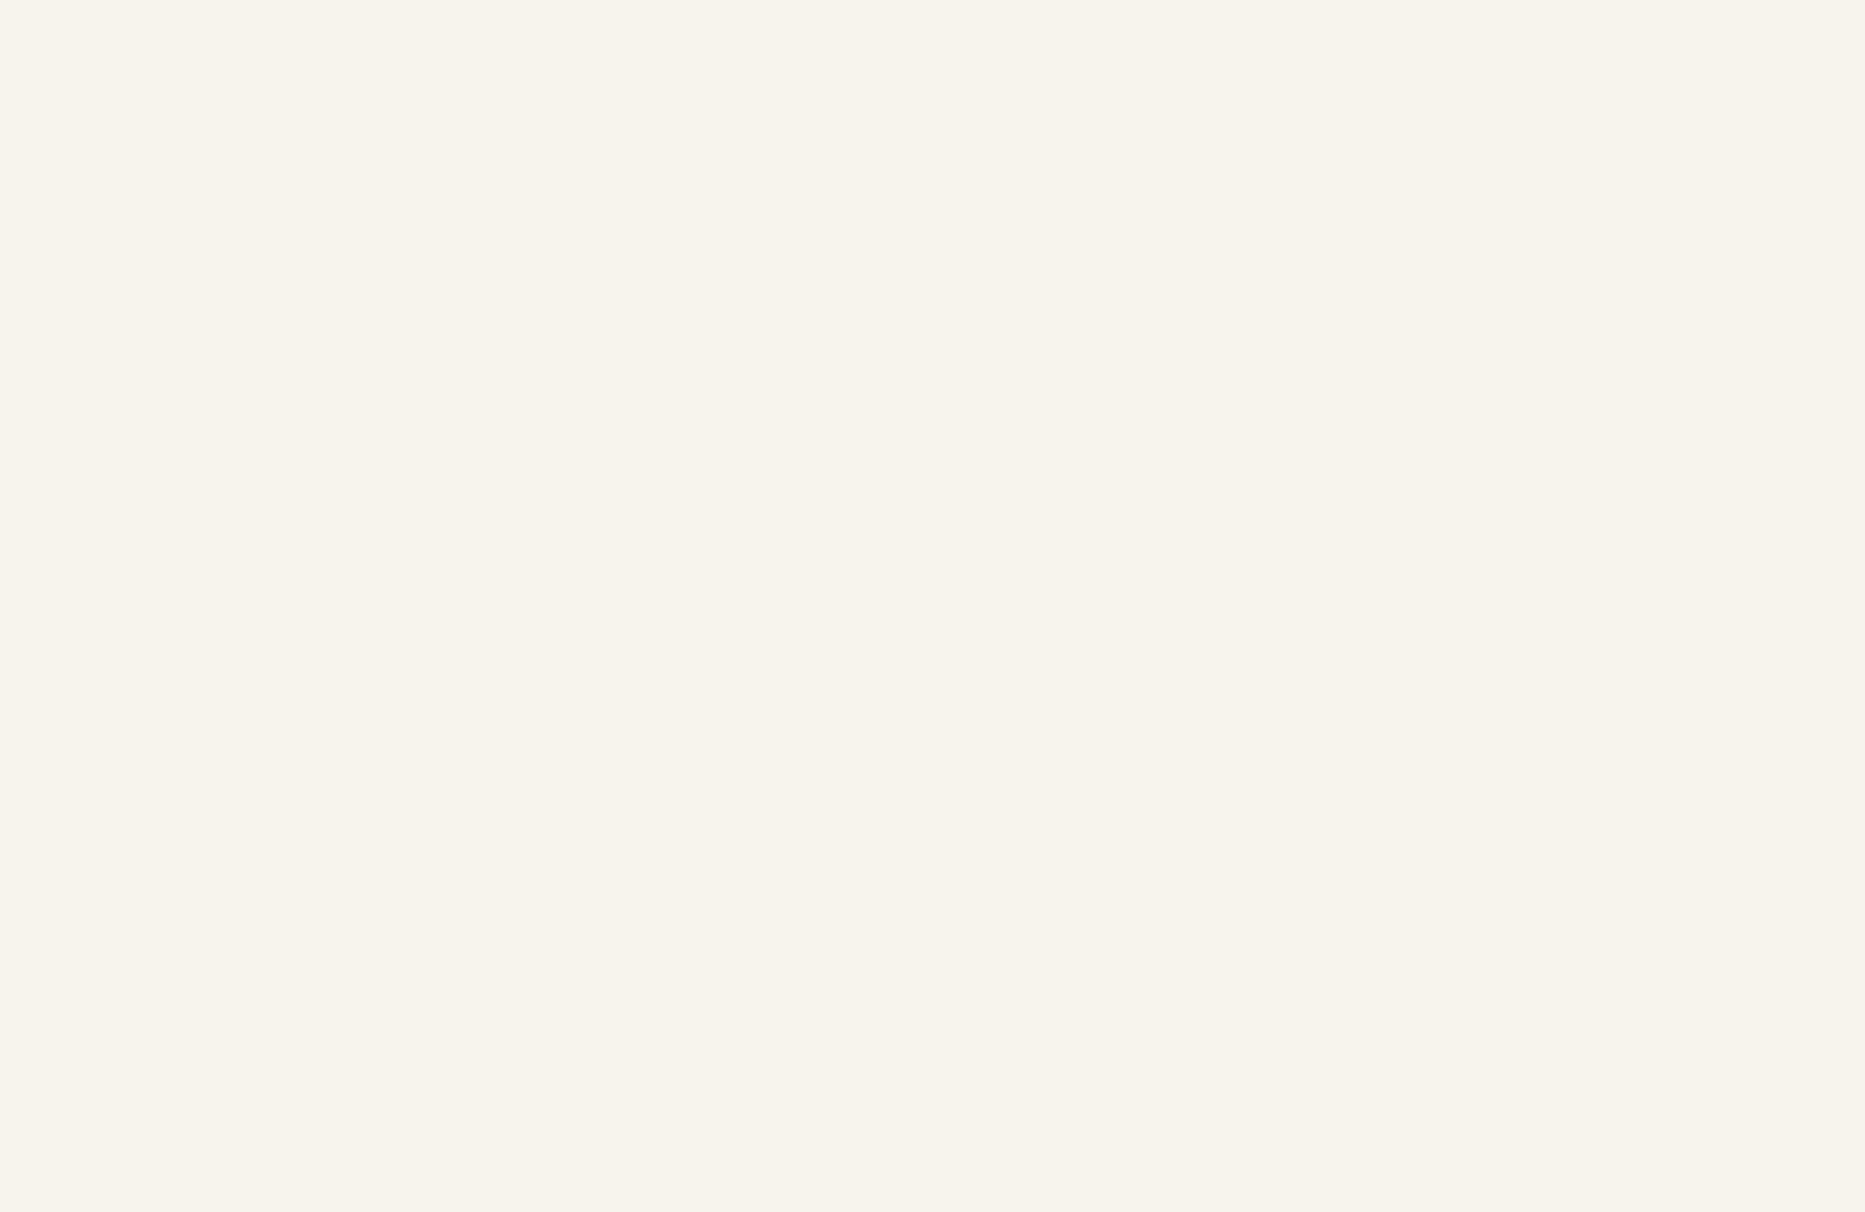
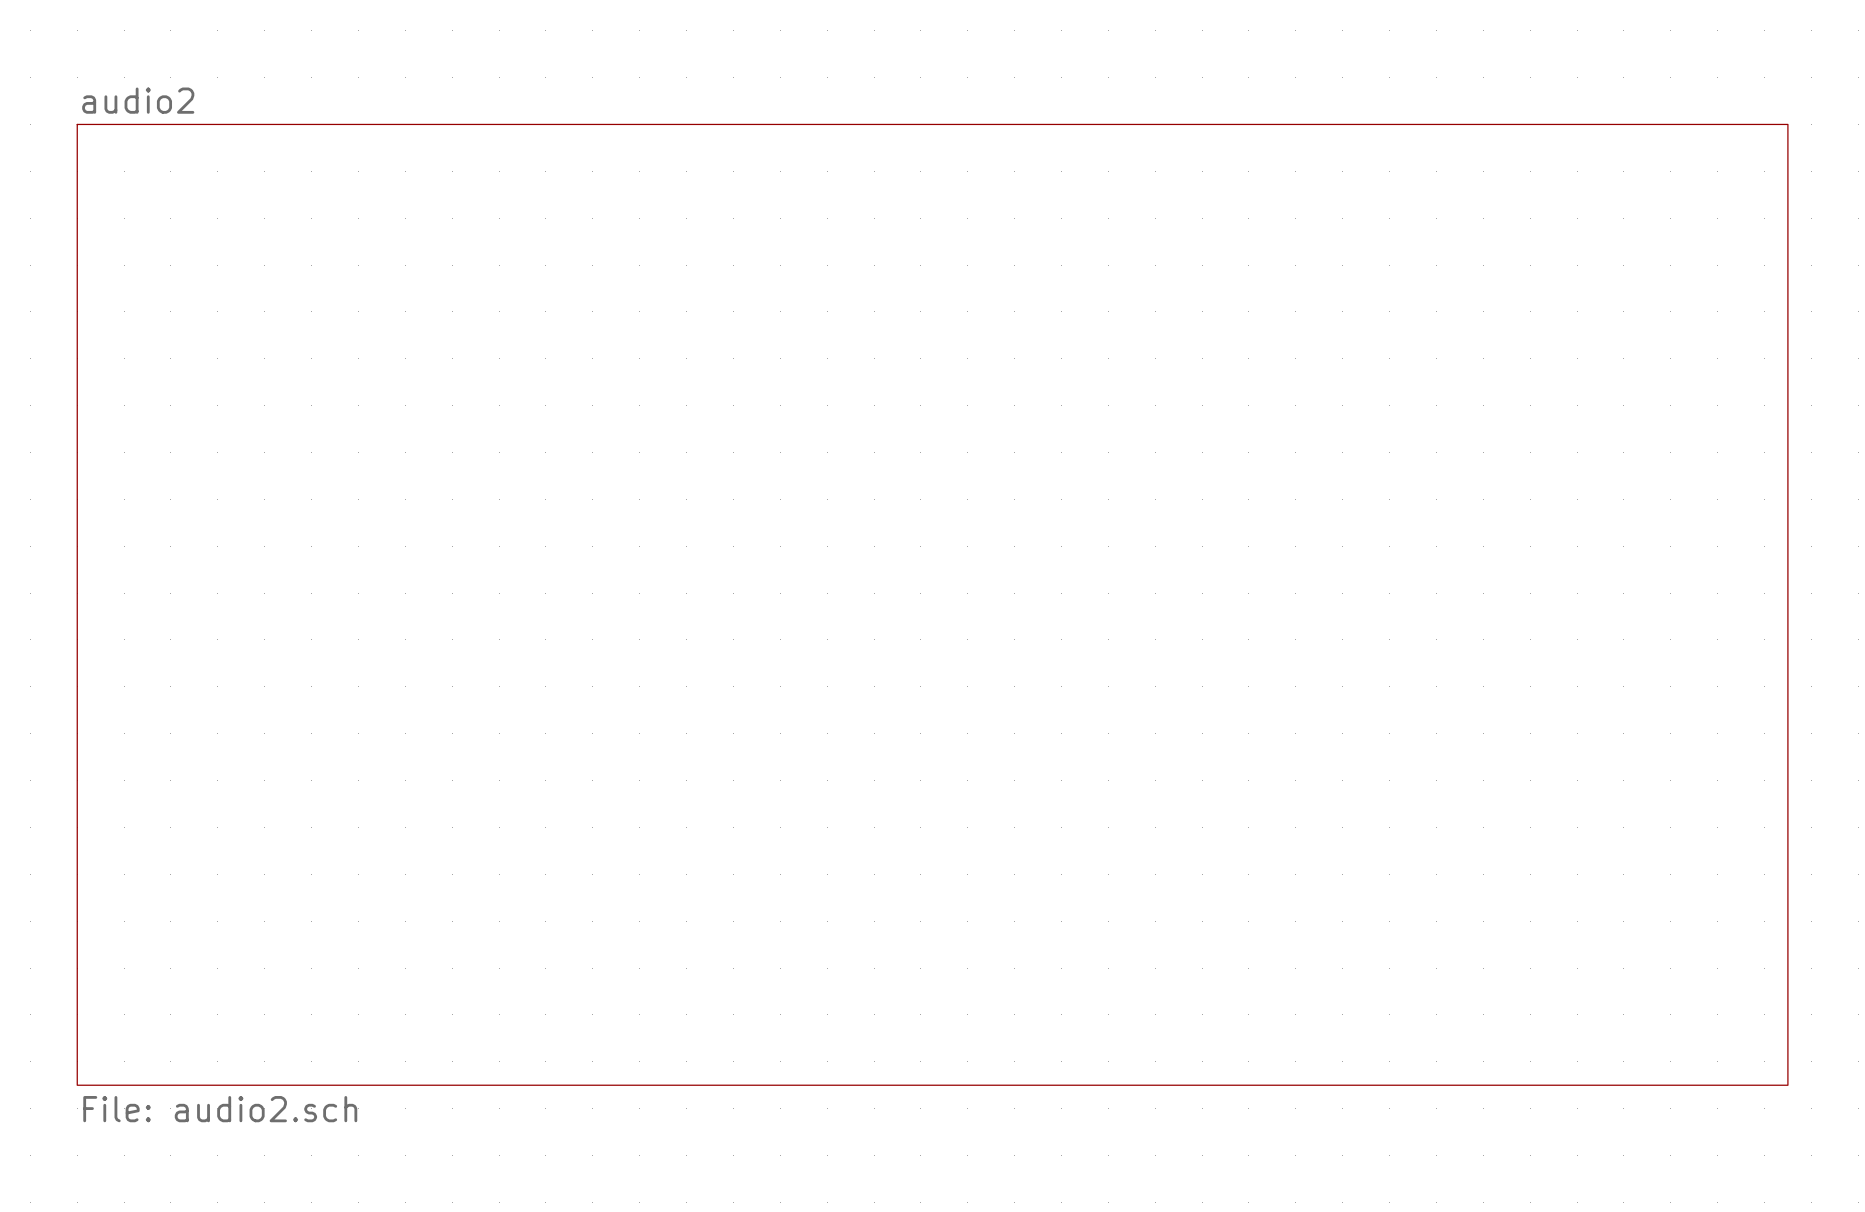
sheet audio2: none -> File: audio2.sch (932, 604)

